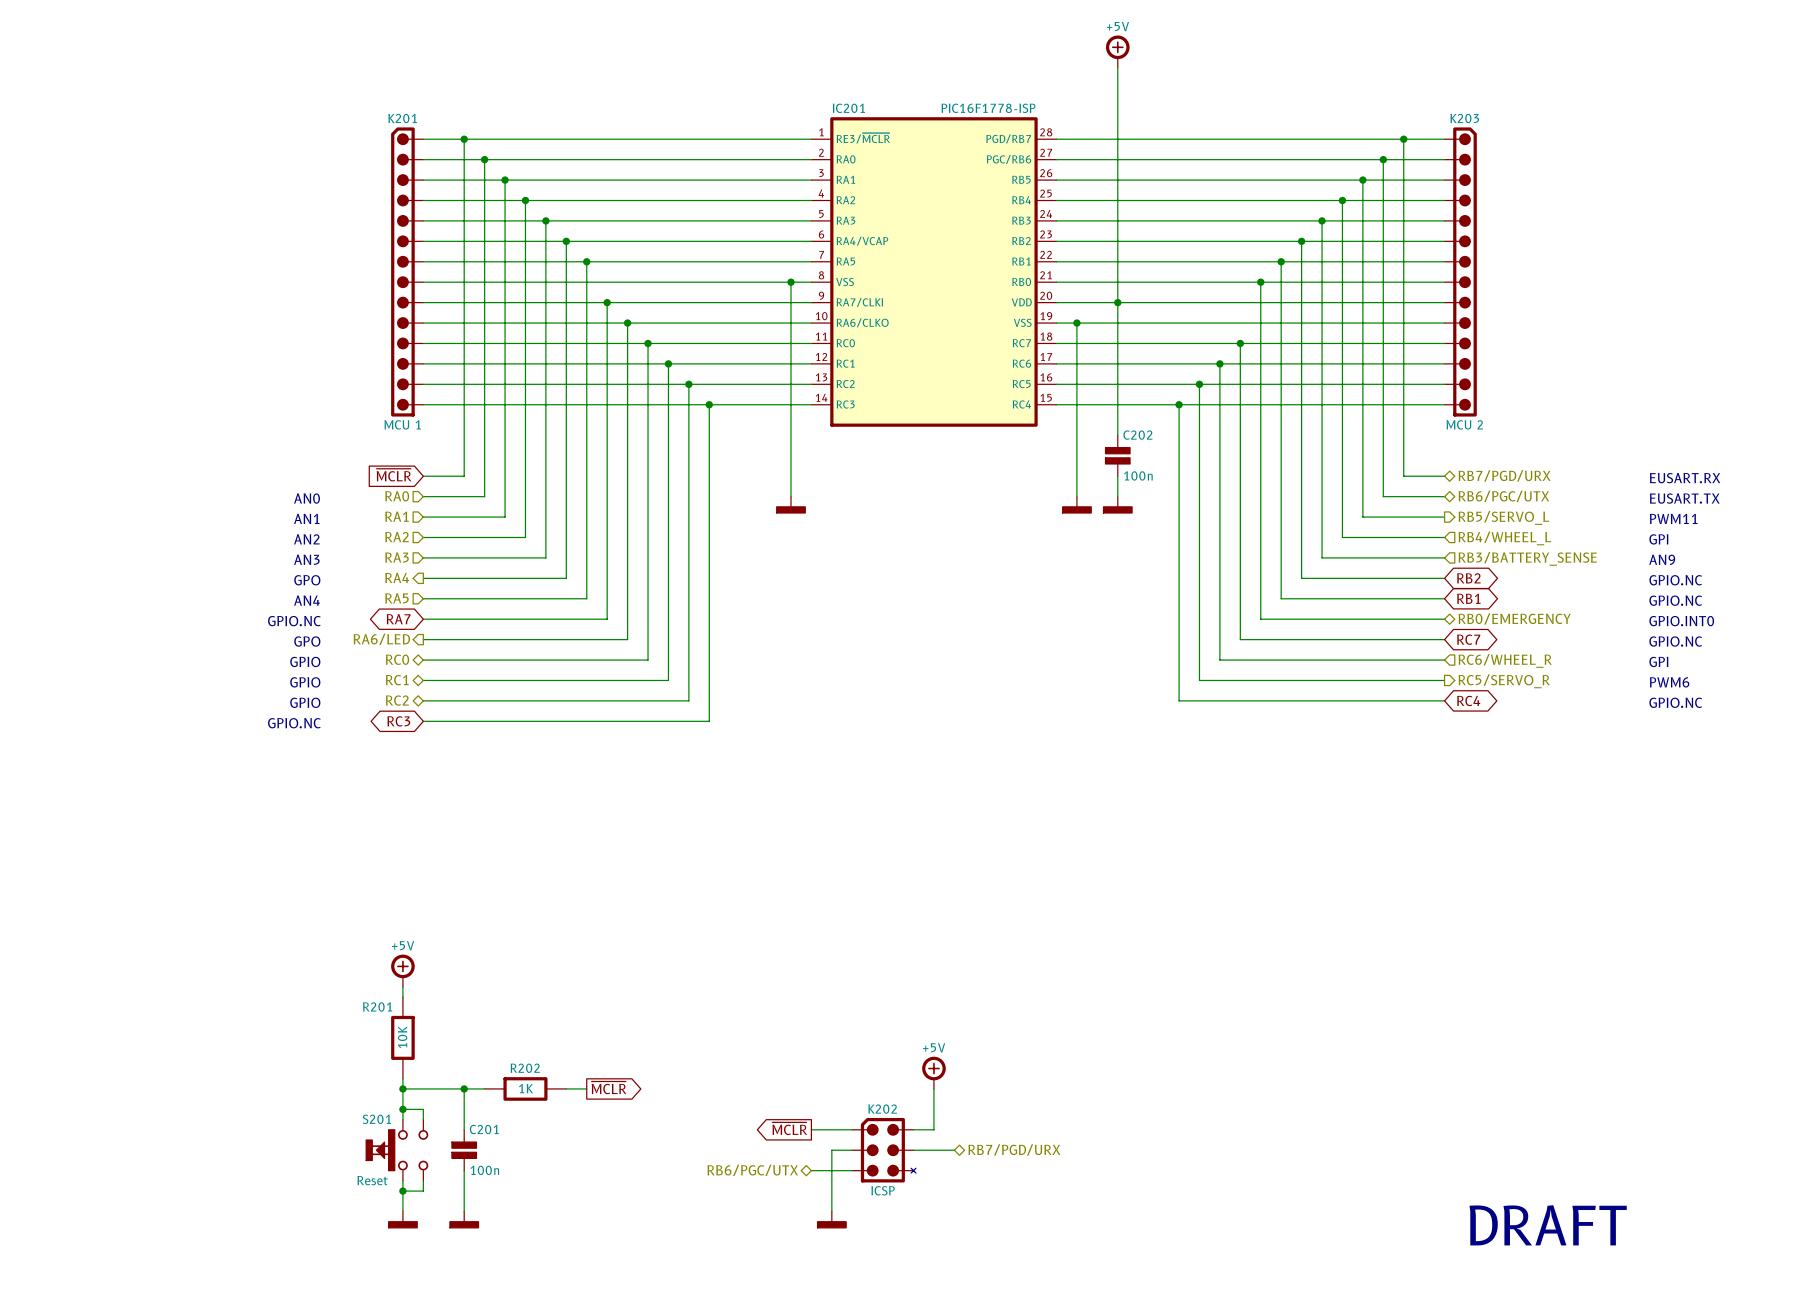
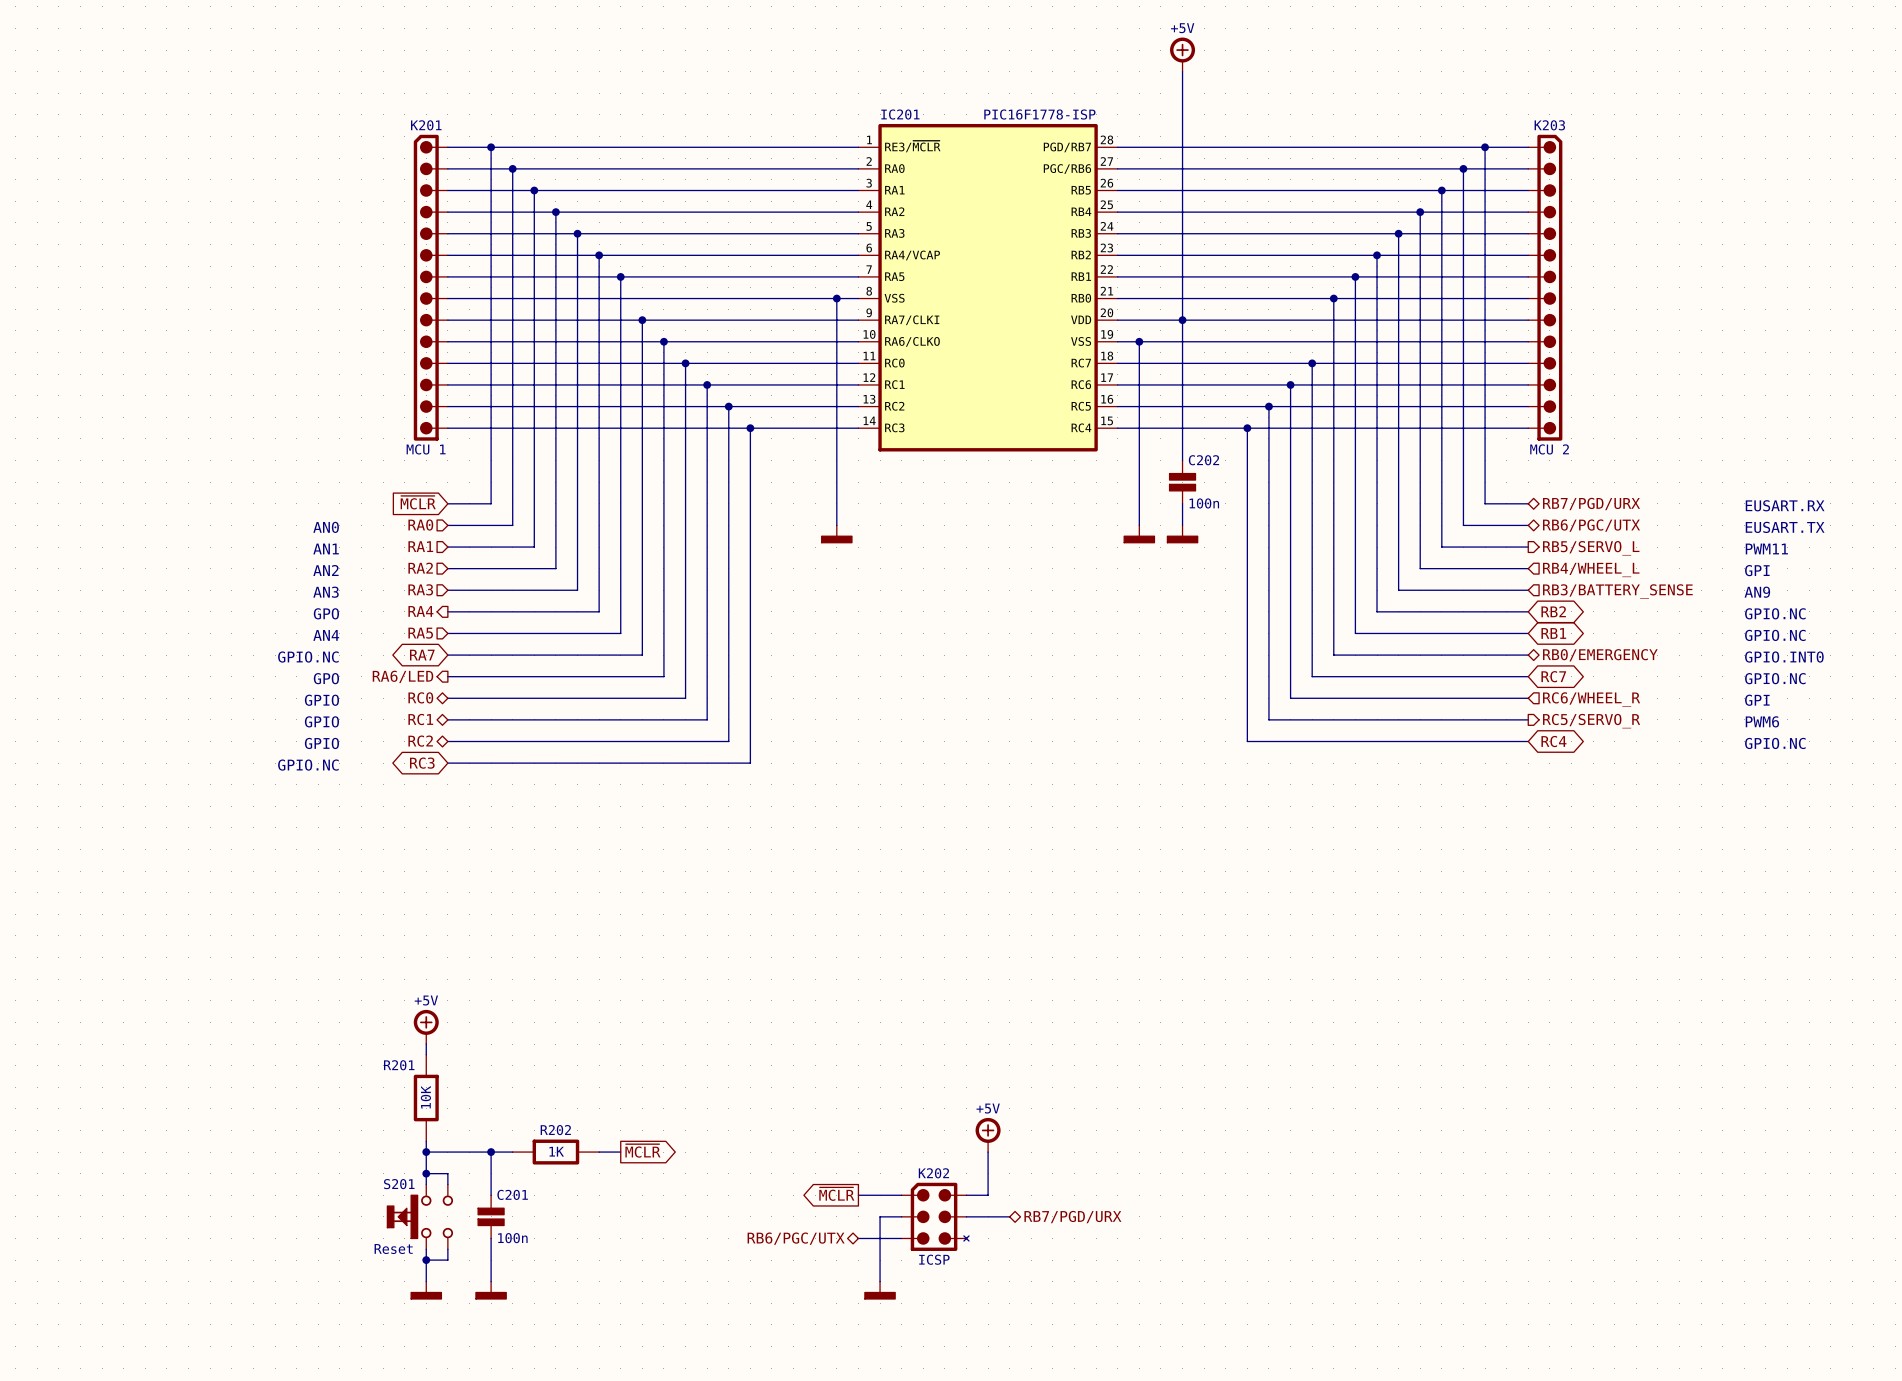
text: DRAFT (1548, 1225) -> none

